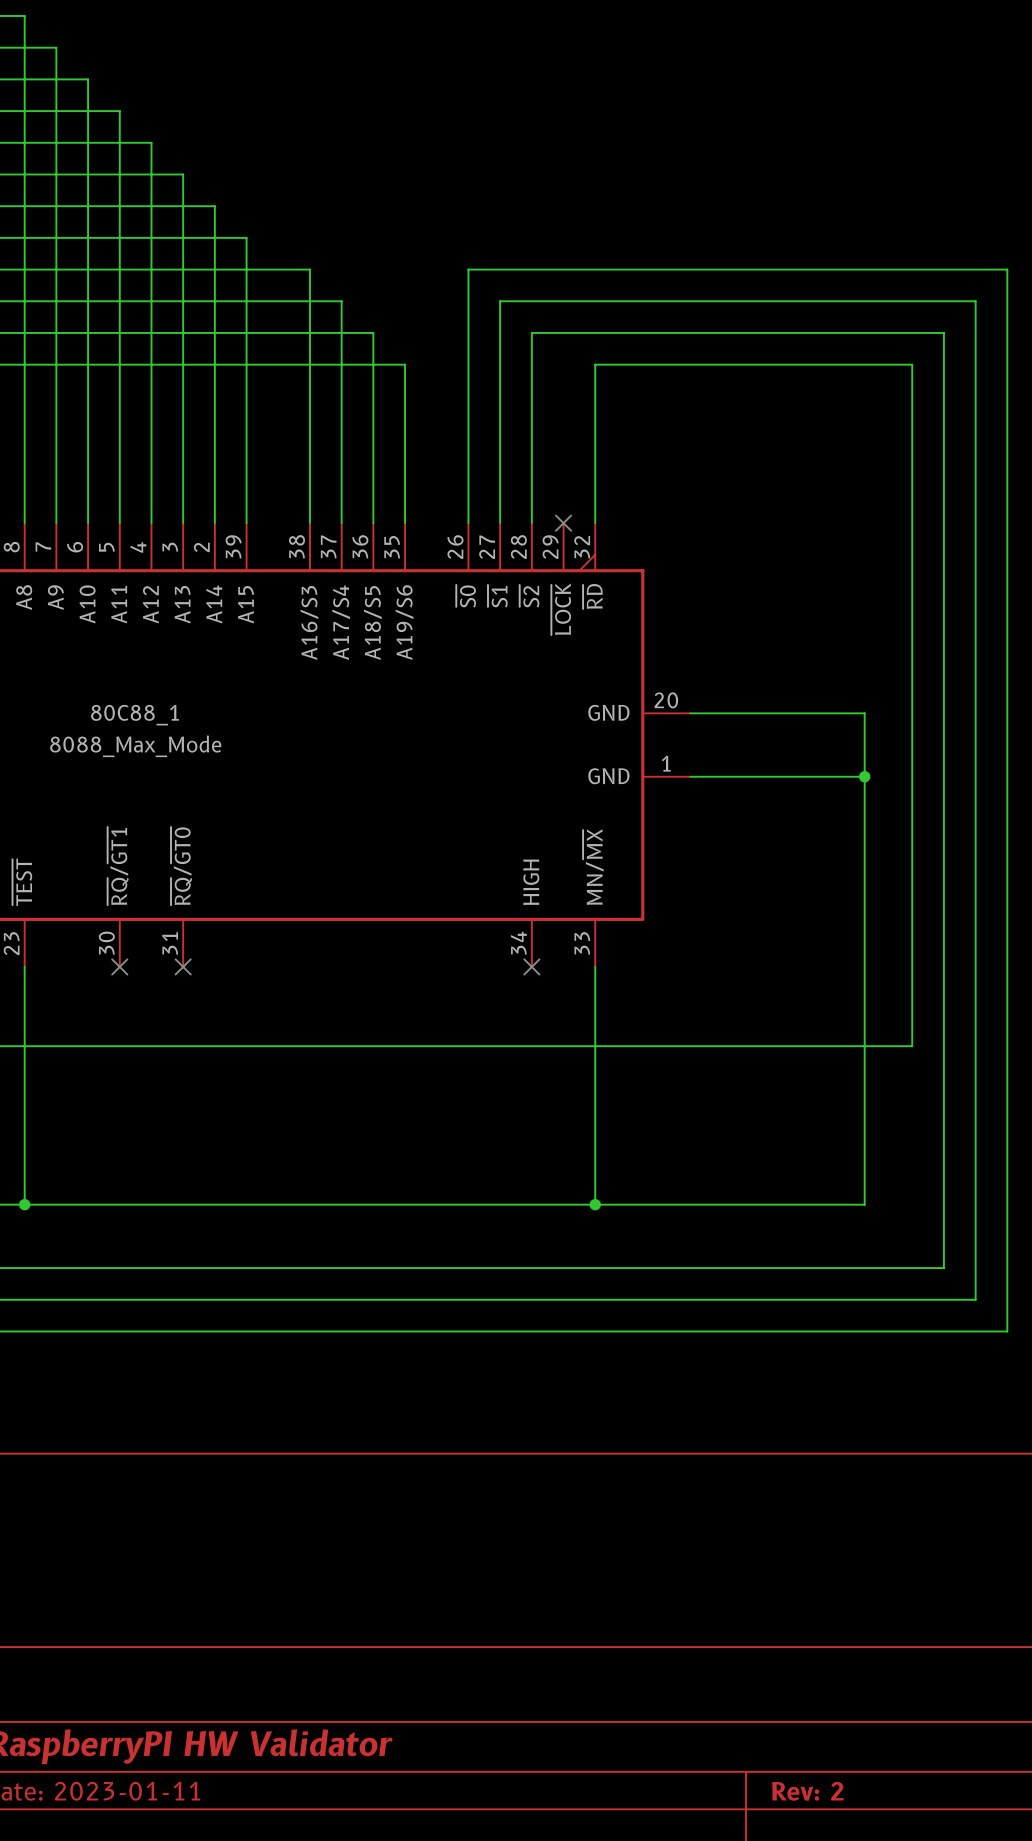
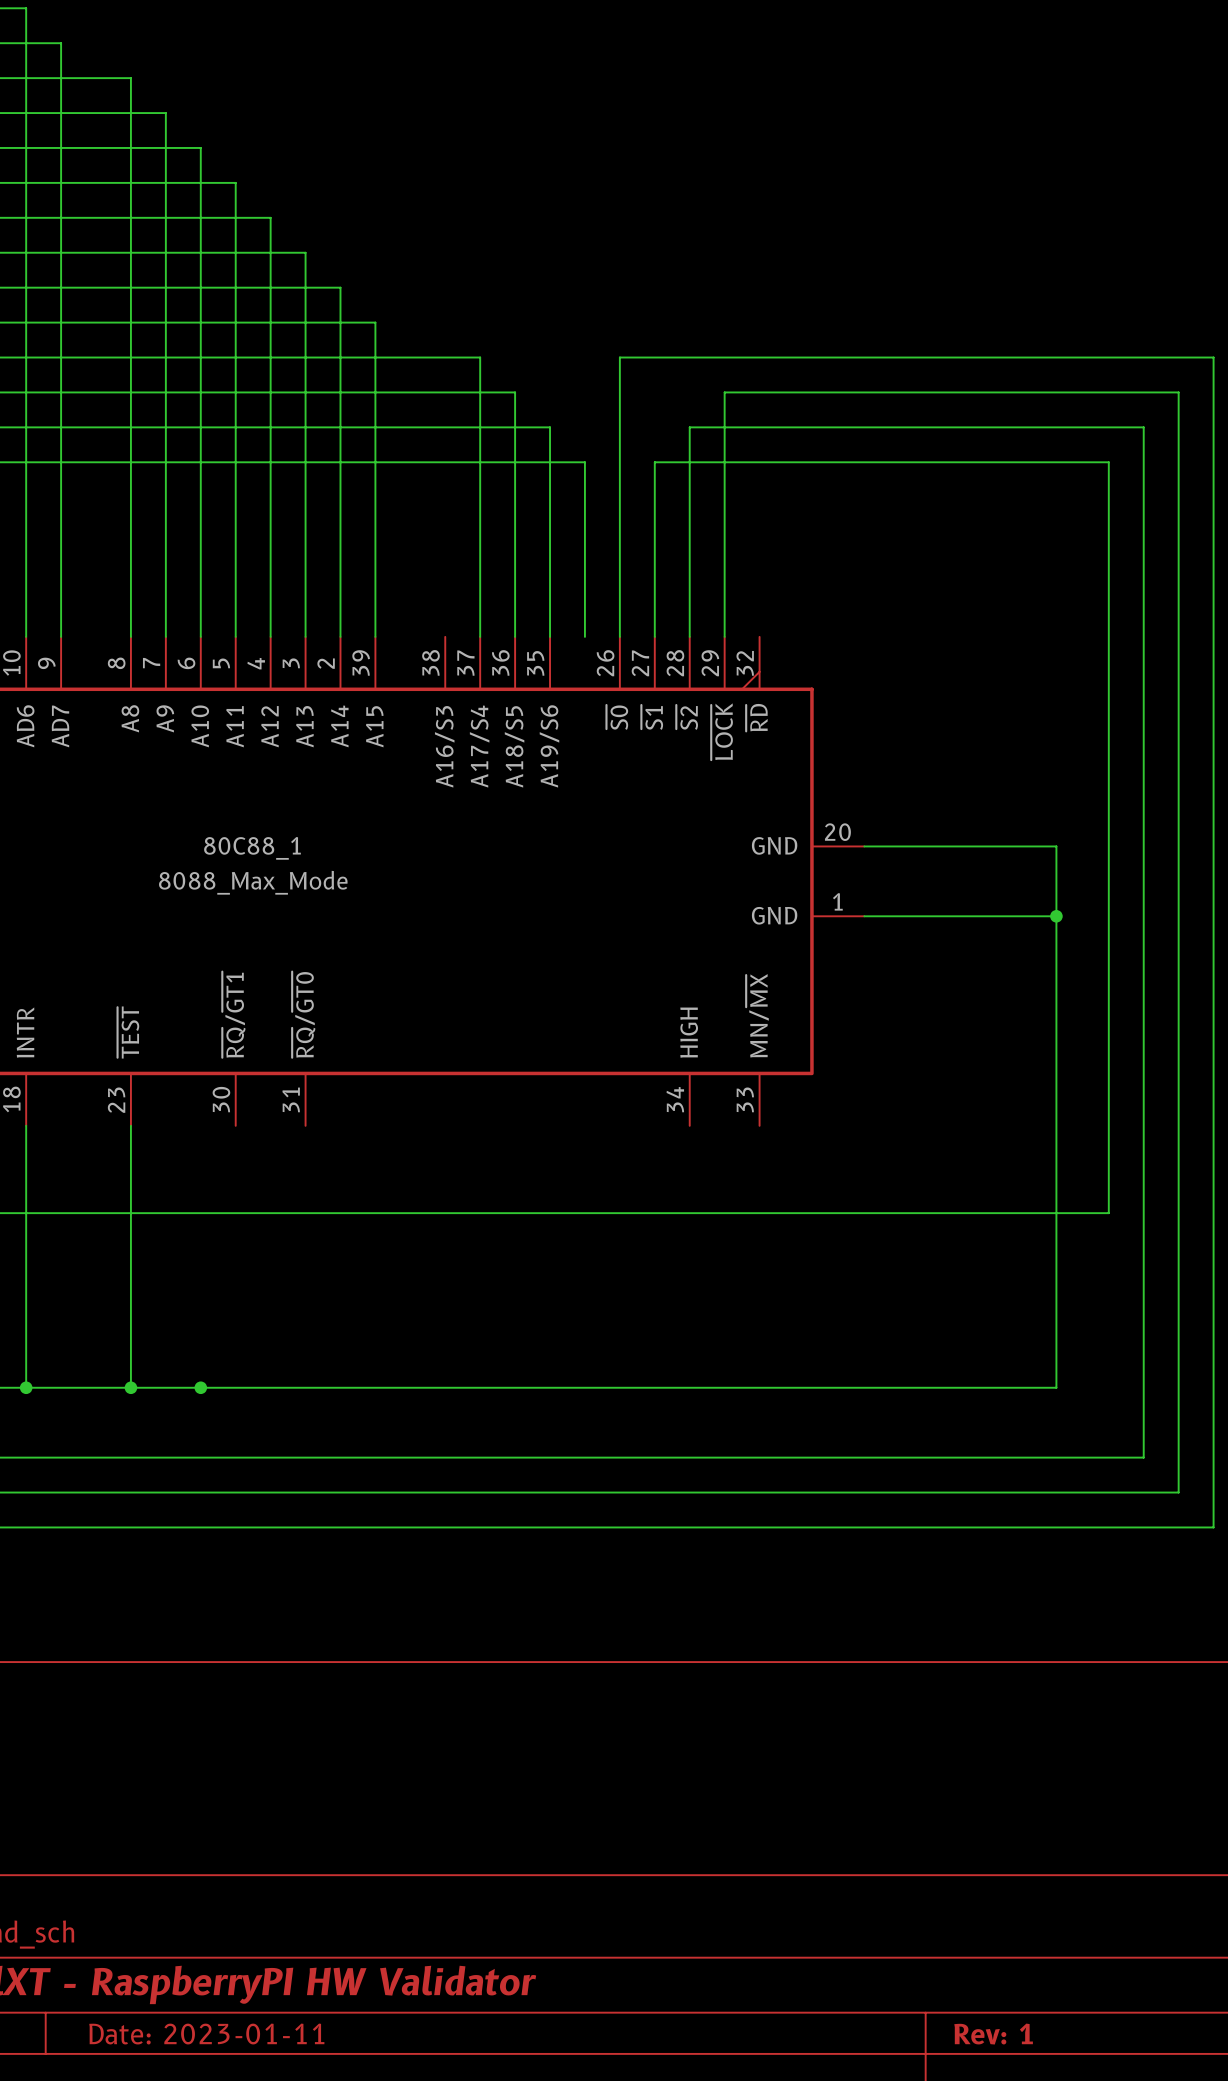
wire: (309, 269) (309, 523) -> (445, 357) (480, 357) (480, 392) (515, 392) (515, 427) (550, 427) (550, 462) (584, 462) (584, 636)
wire: (563, 301) (500, 301) (500, 364) -> (759, 462) (654, 462)
wire: none -> (724, 392) (724, 636)
wire: (595, 364) (595, 523) -> none
no-connect mark: (563, 523) -> none
no-connect mark: (119, 966) -> none
no-connect mark: (183, 966) -> none
no-connect mark: (531, 966) -> none
wire: (595, 966) (595, 1204) -> none
junction: none -> (200, 1387)
junction: (595, 1204) -> none
title block: Rev: 2 (807, 1791) -> Rev: 1 (993, 2034)

